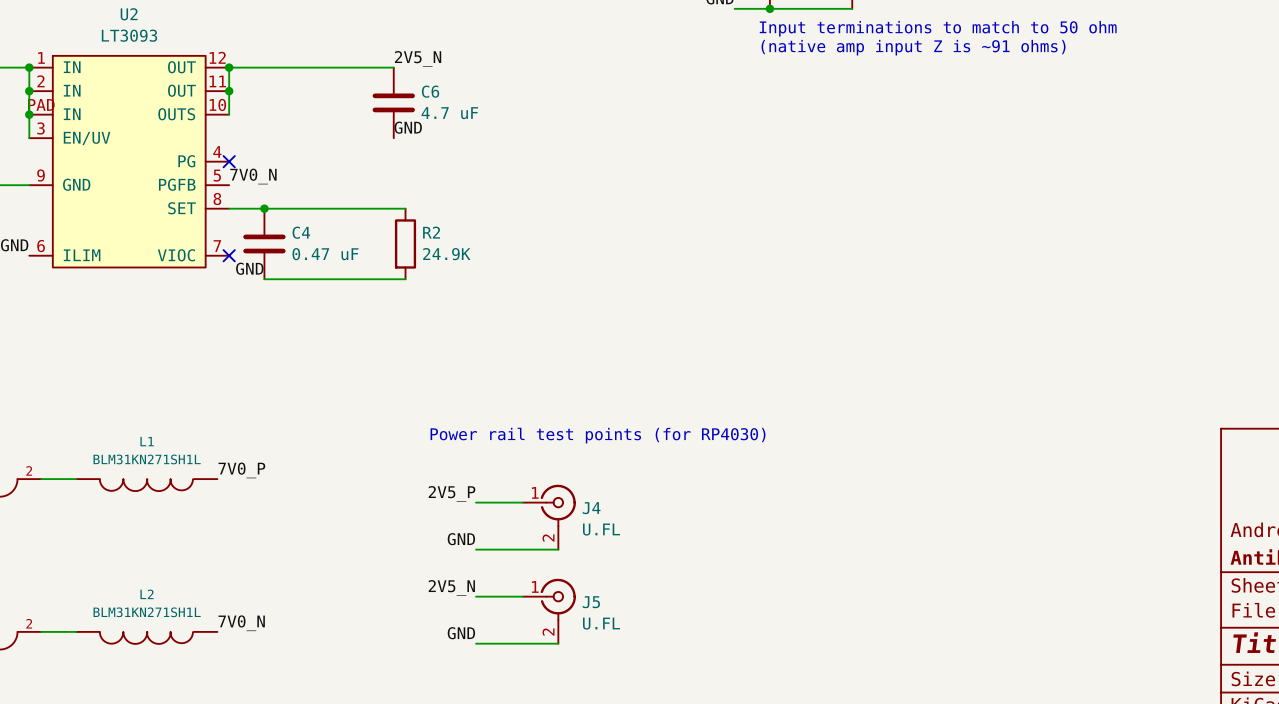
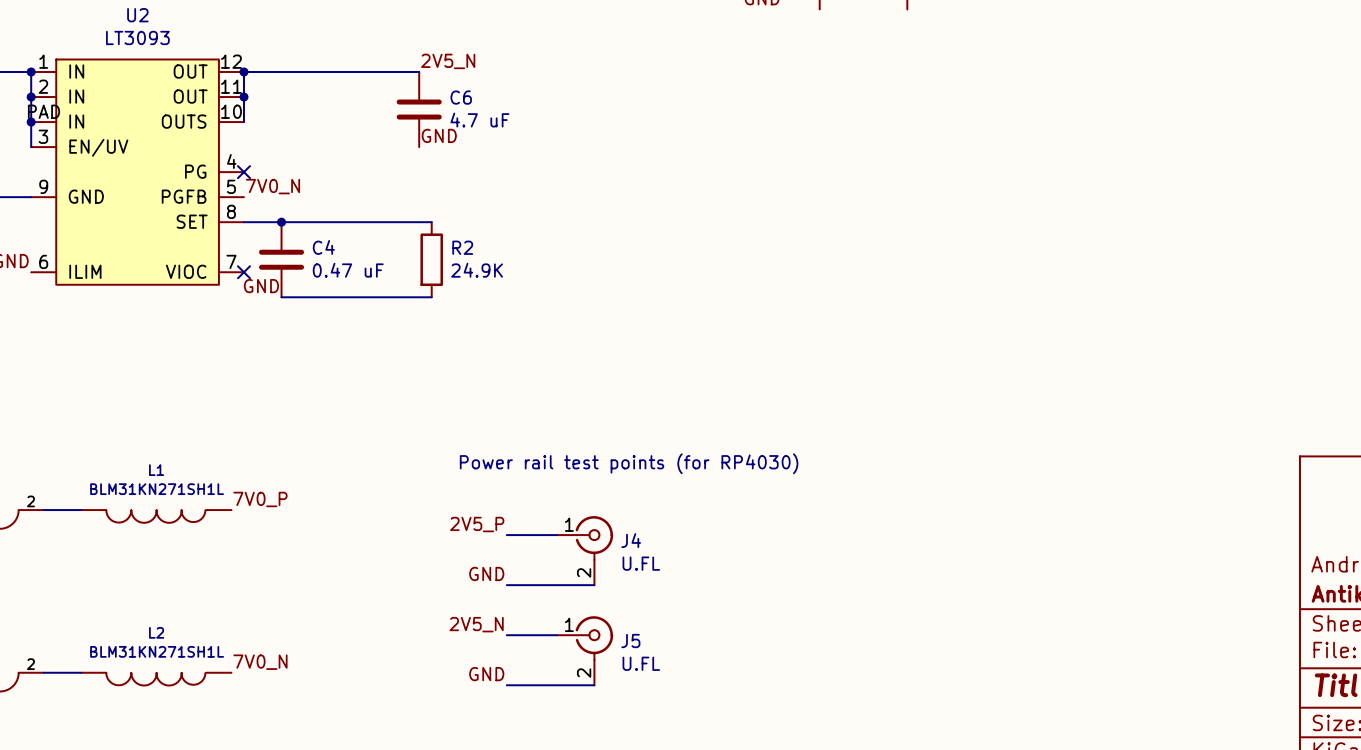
wire: (734, 8) (852, 8) -> none
junction: (769, 8) -> none
text: Input terminations to match to 50 ohm (938, 28) -> none
text: (native amp input Z is ~91 ohms) (913, 47) -> none

